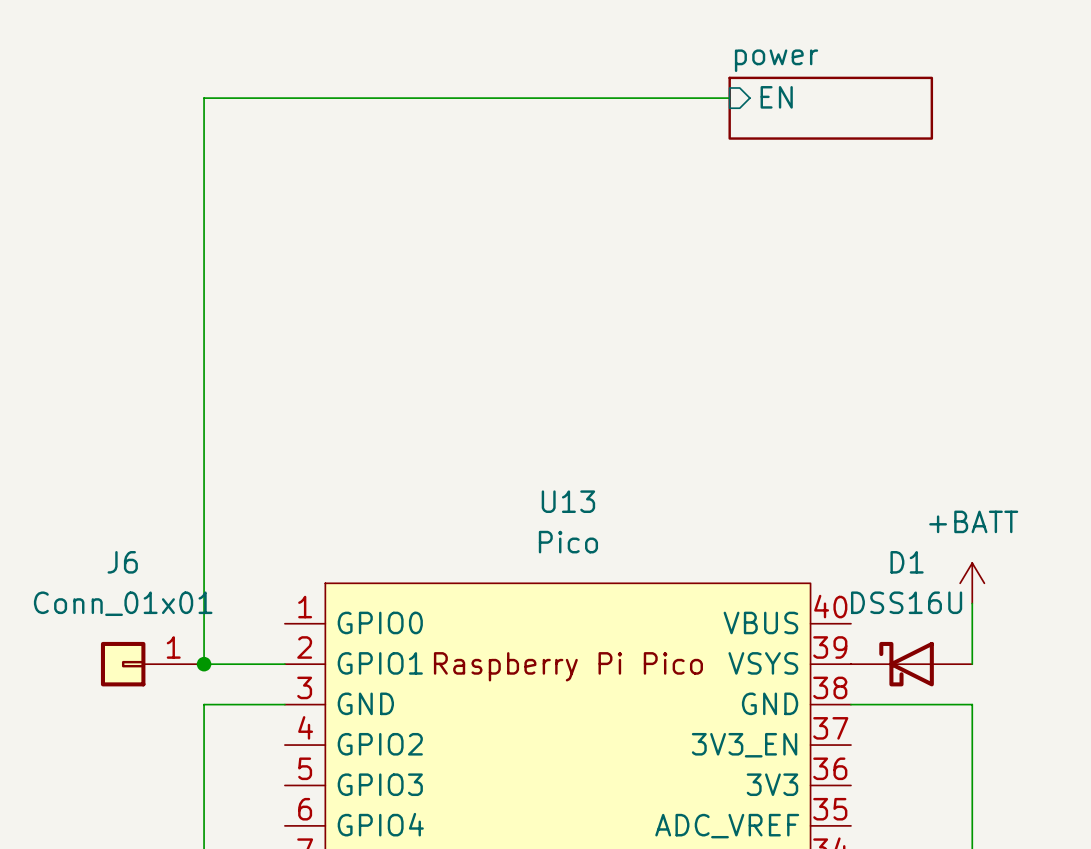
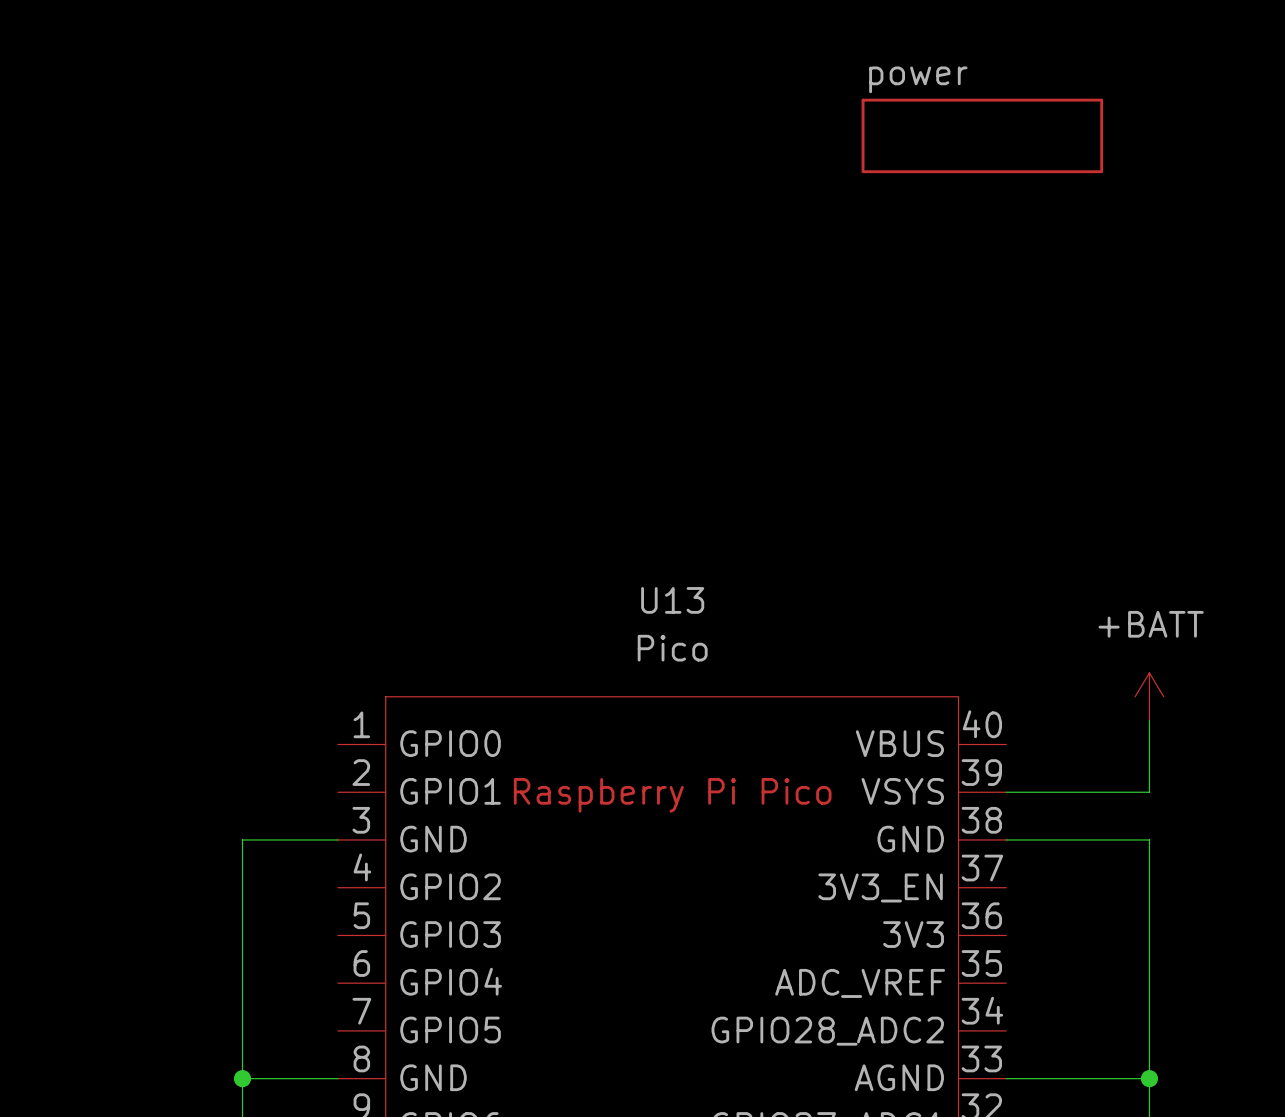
sheet pin: EN (776, 97) -> none
wire: (729, 98) (204, 98) (204, 664) (284, 664) -> none
J6: Conn_01x01 (152, 664) -> none
junction: (204, 664) -> none
D1: DSS16U (911, 664) -> none

